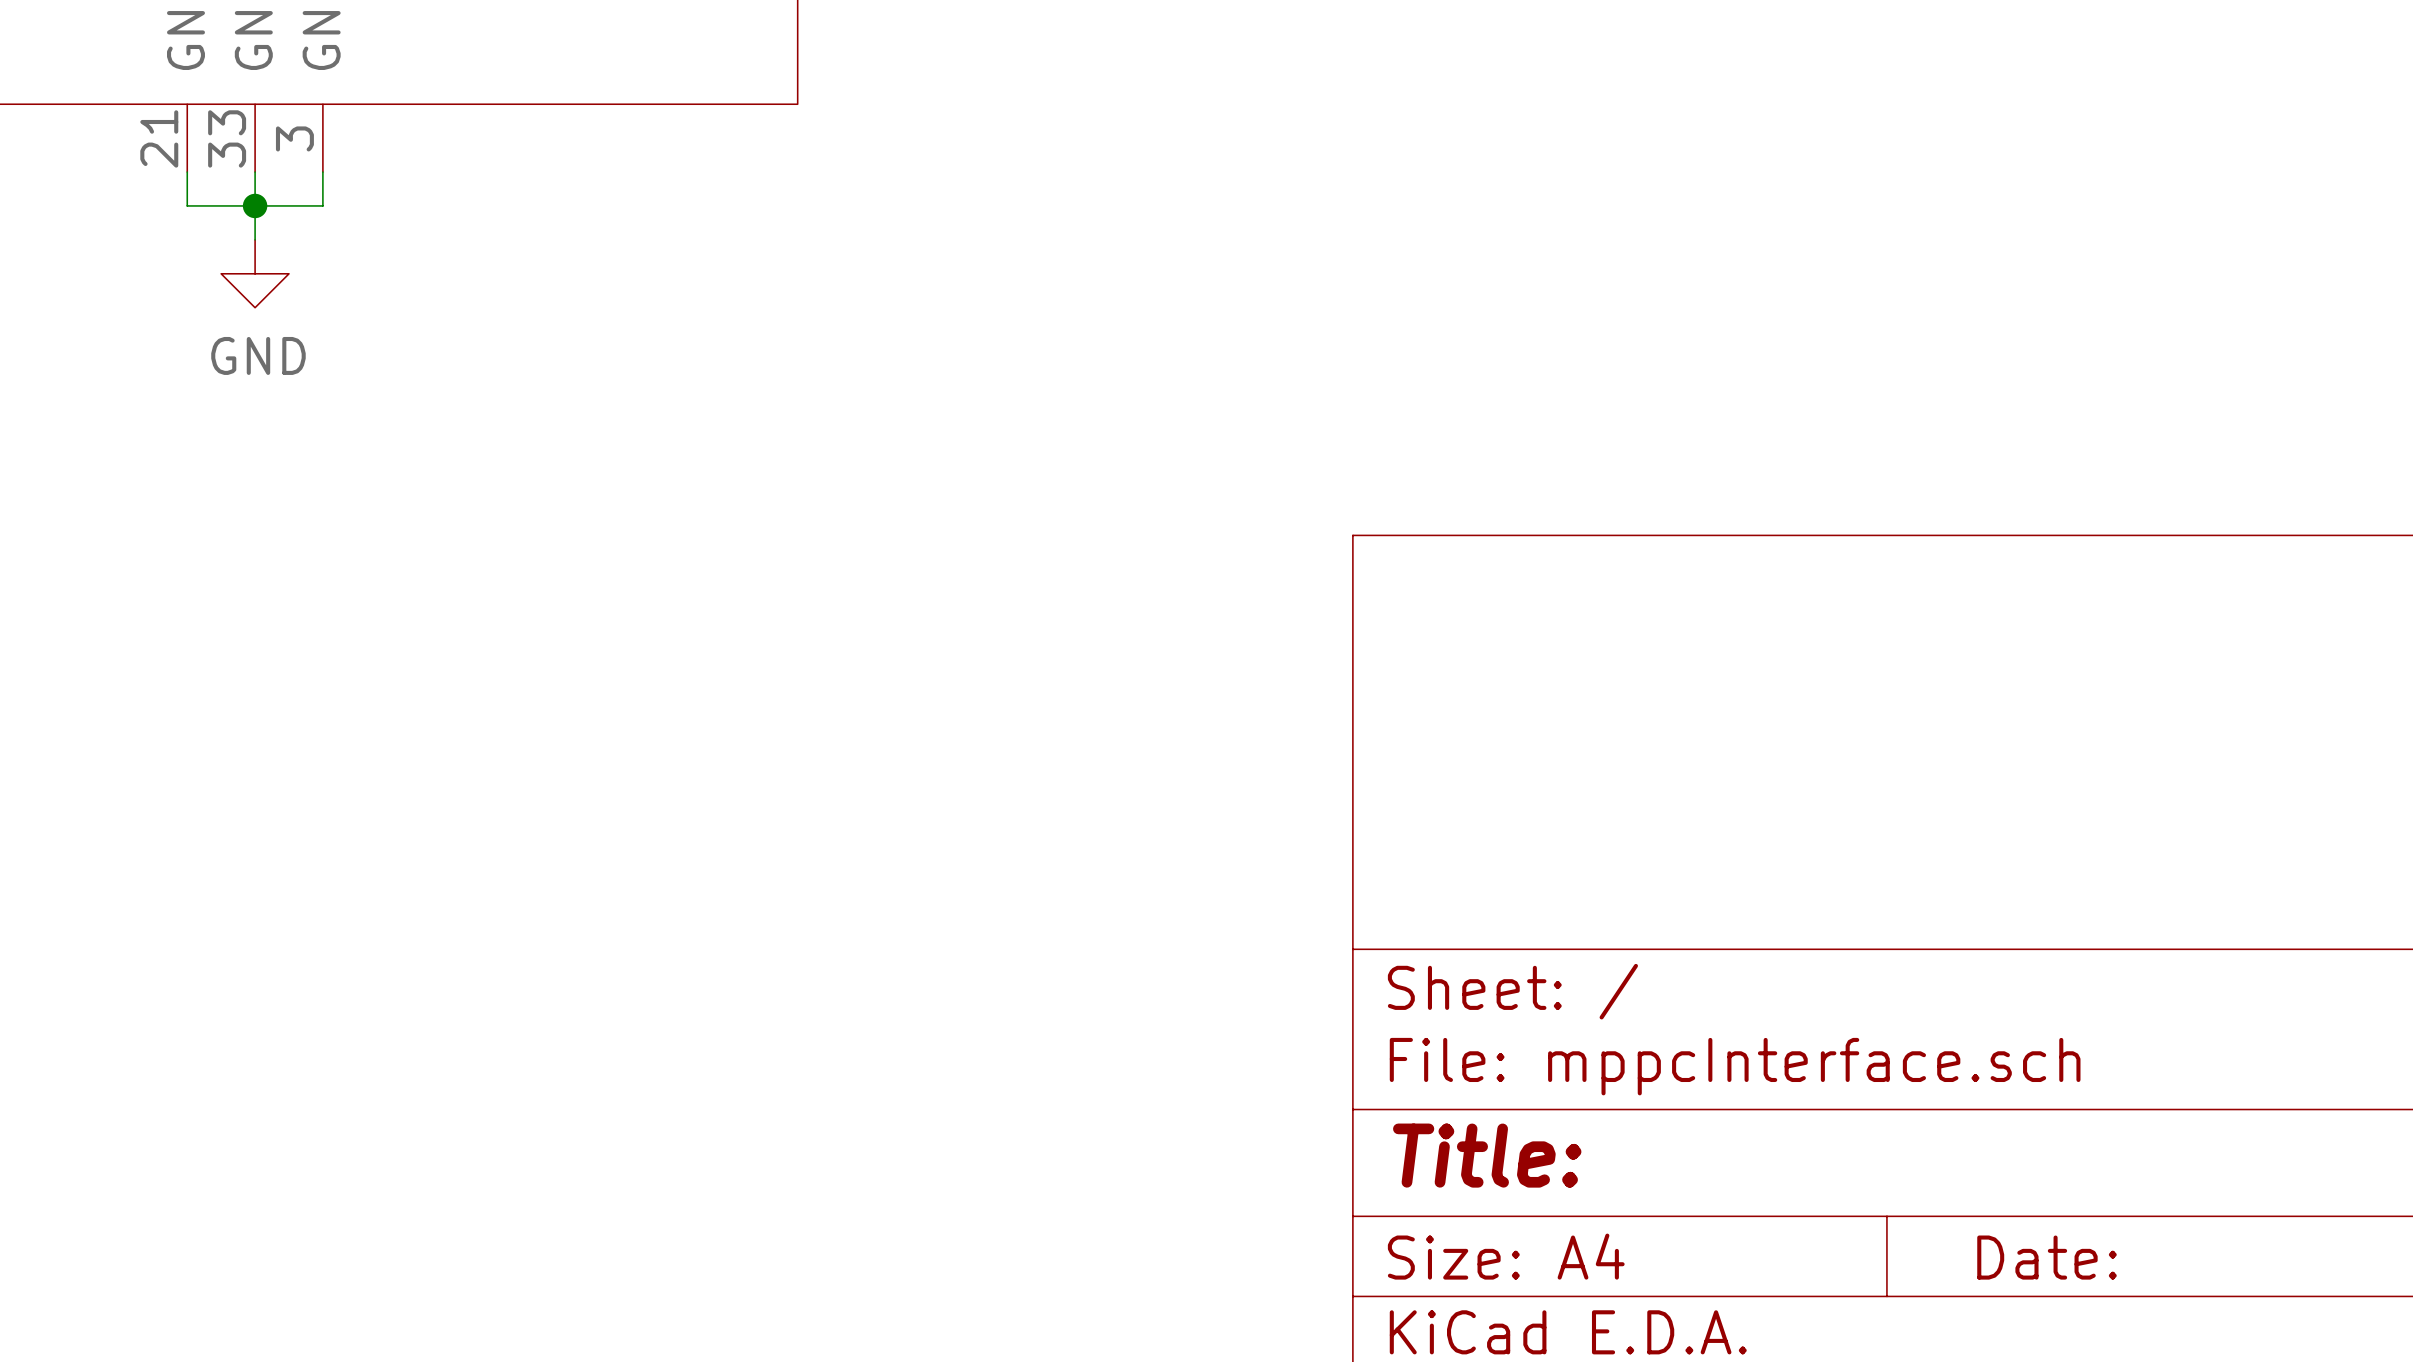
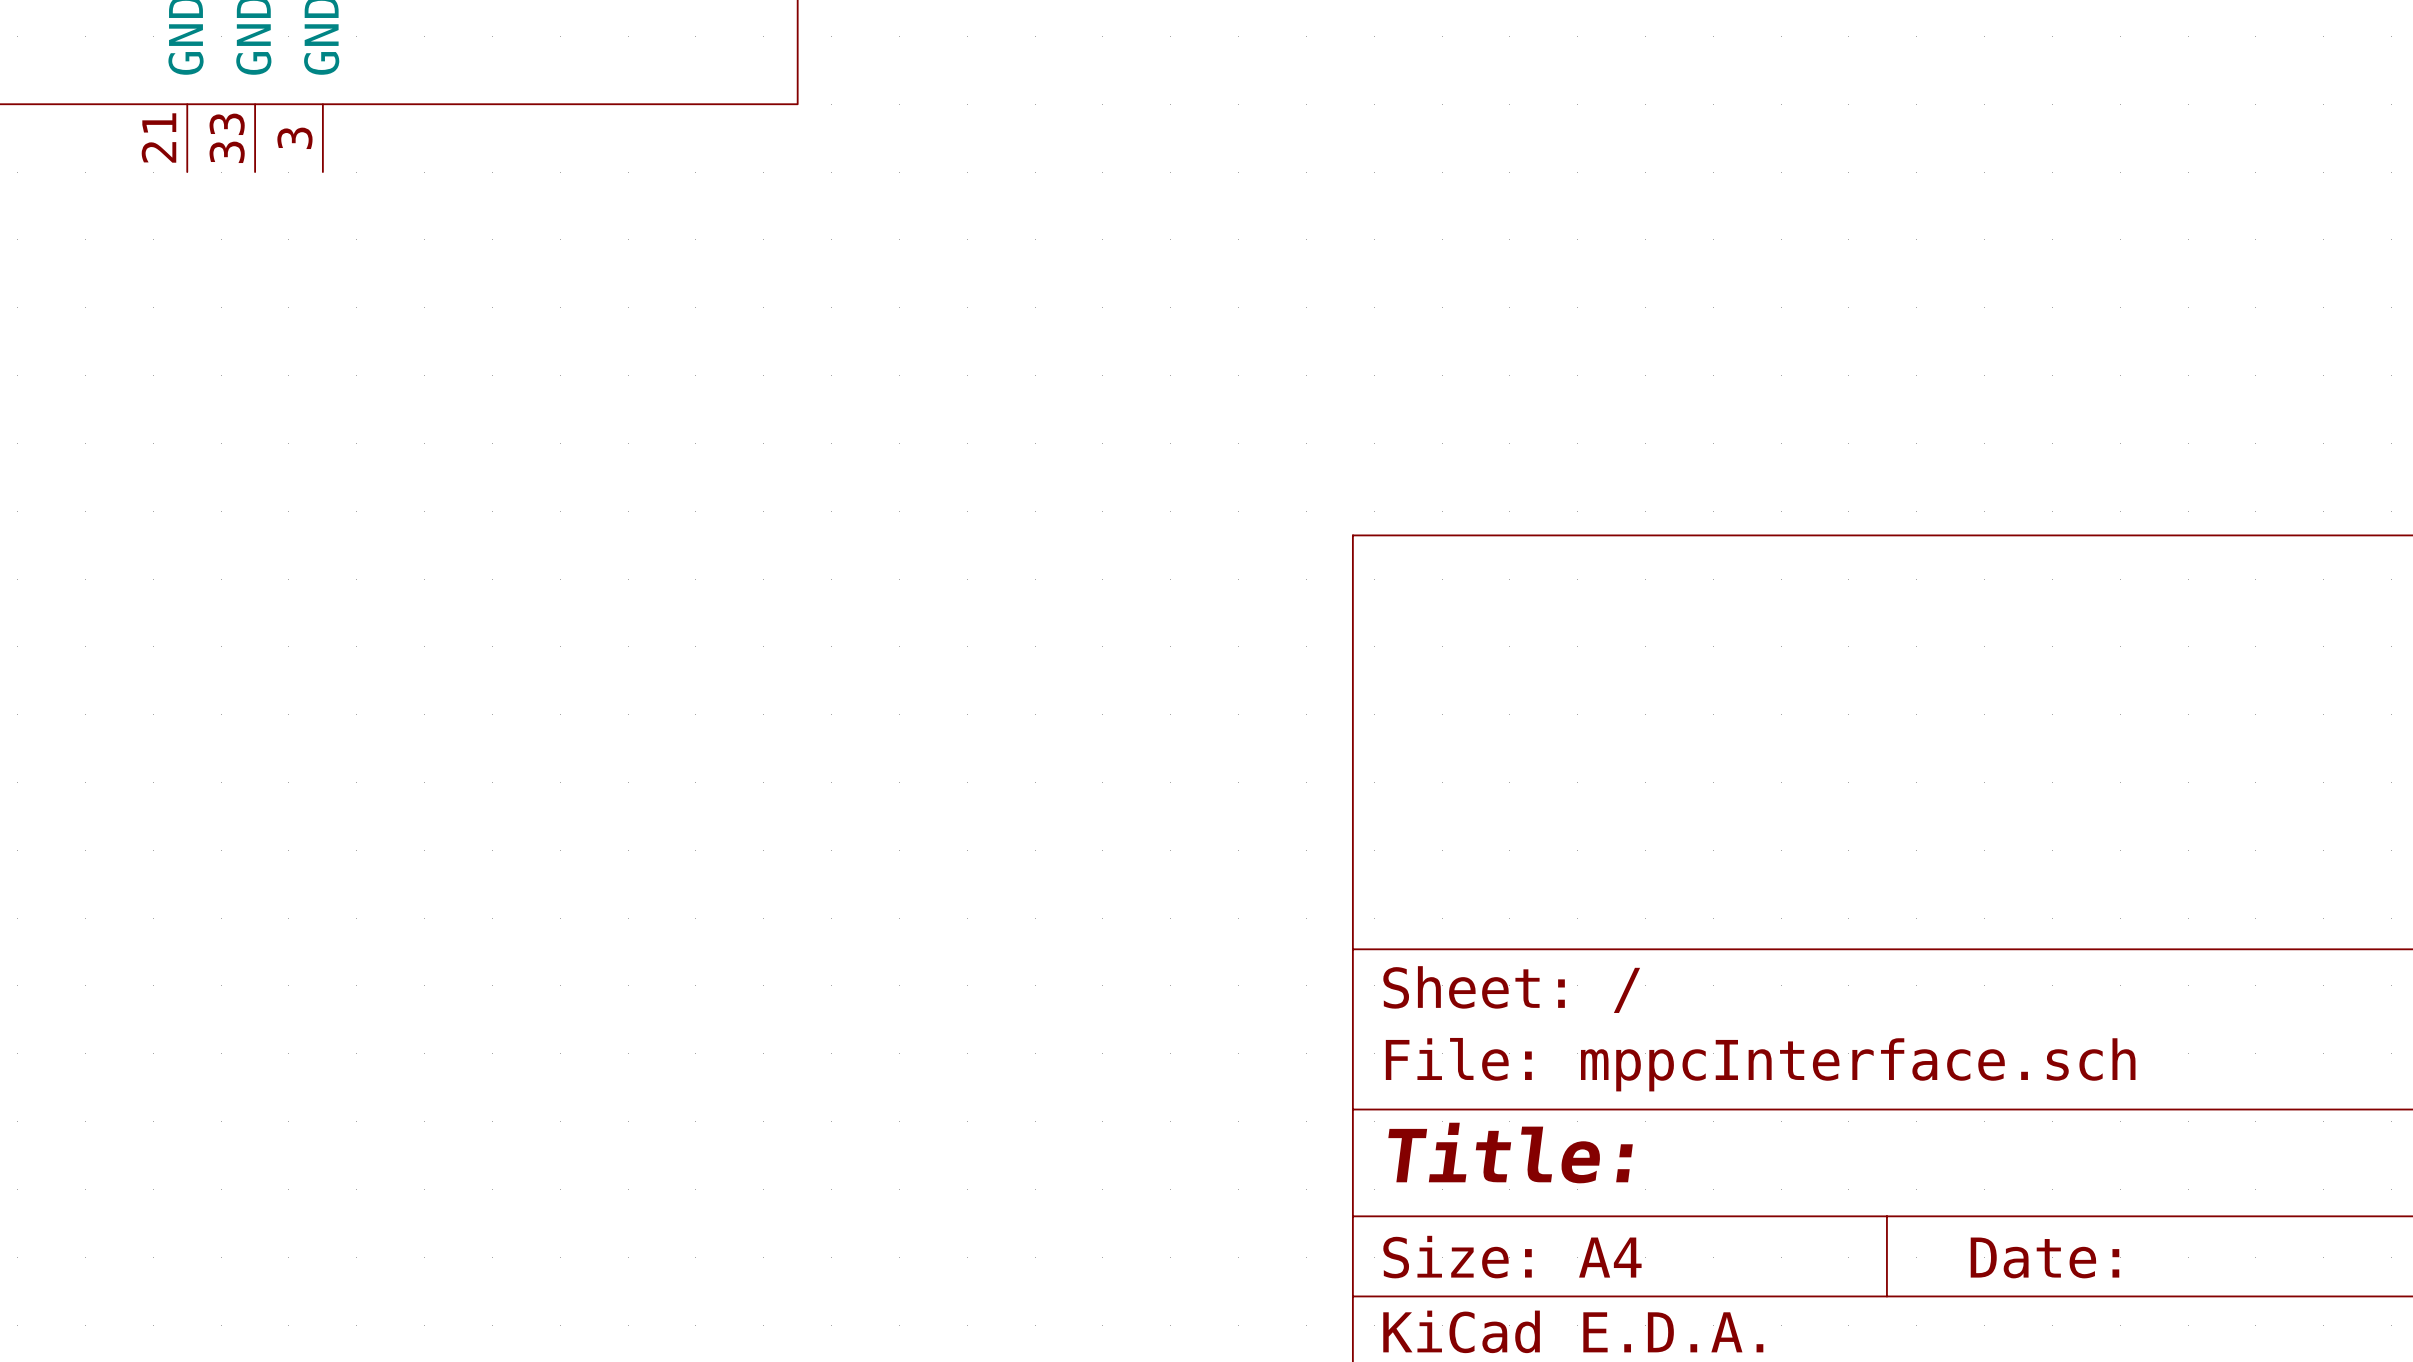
wire: (187, 172) (187, 205) (322, 205) (322, 172) -> none
wire: (255, 172) (255, 239) -> none
junction: (255, 205) -> none
power symbol: GND (255, 273) -> none

